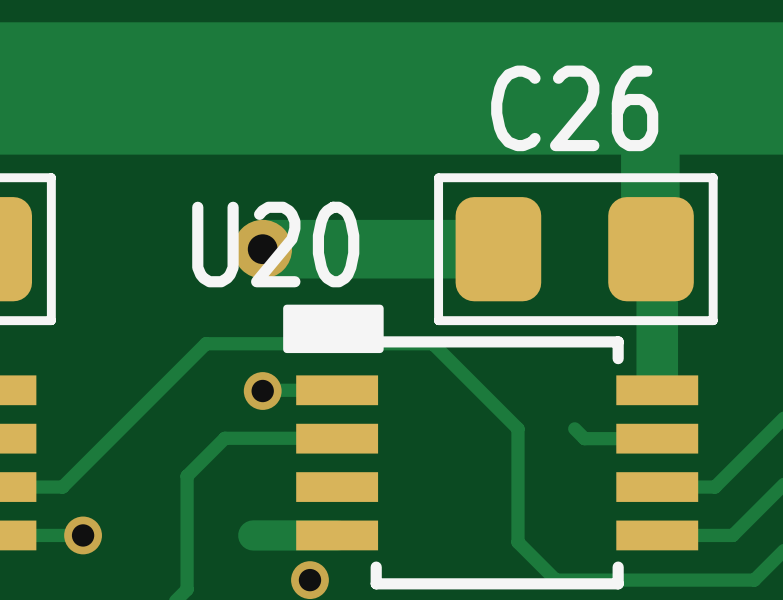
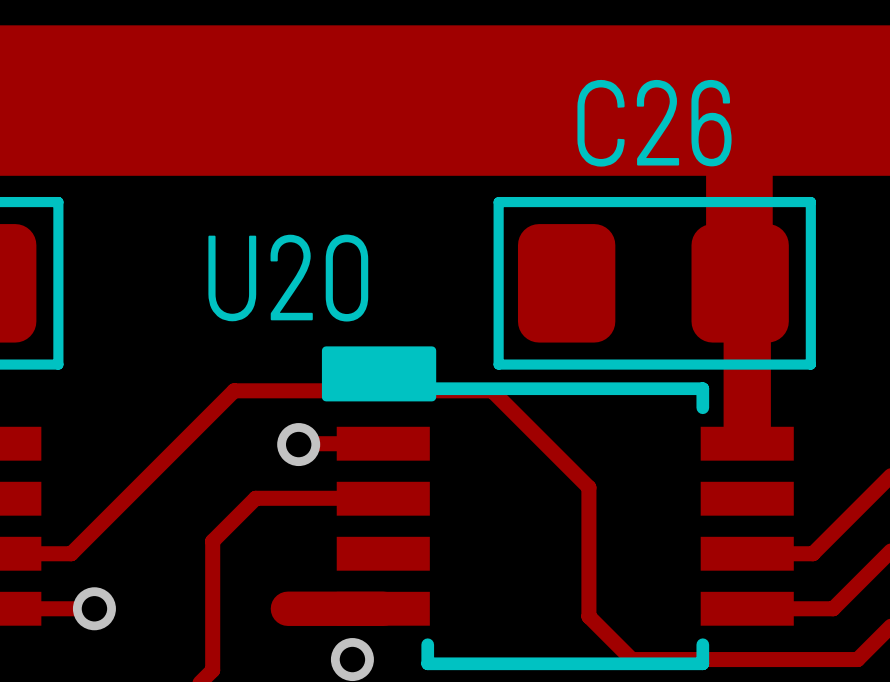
track: (262, 249) (499, 249) -> none
via: (262, 249) -> none
track: (574, 428) (584, 438) (657, 438) -> none

